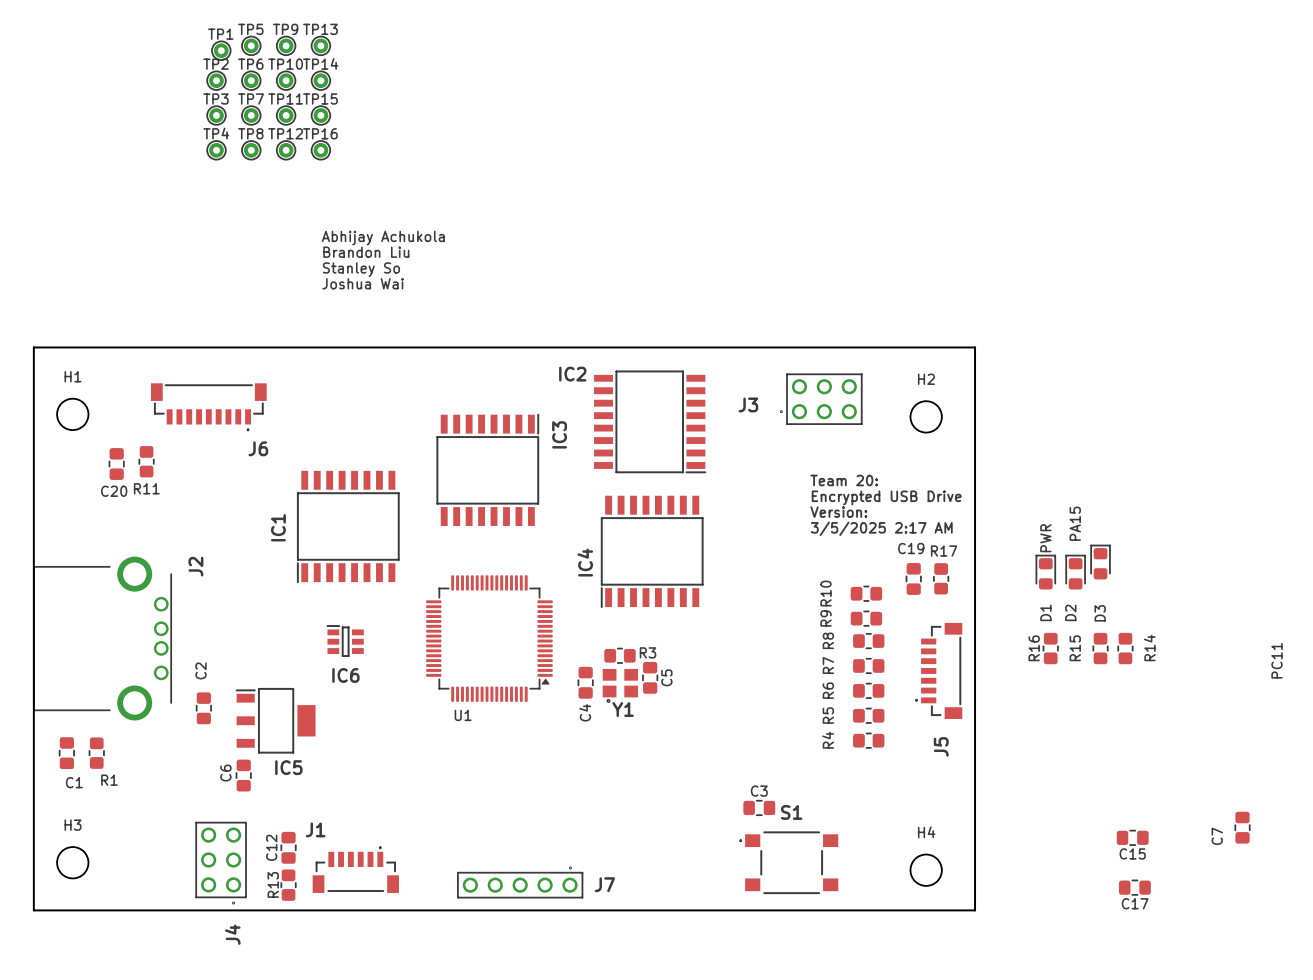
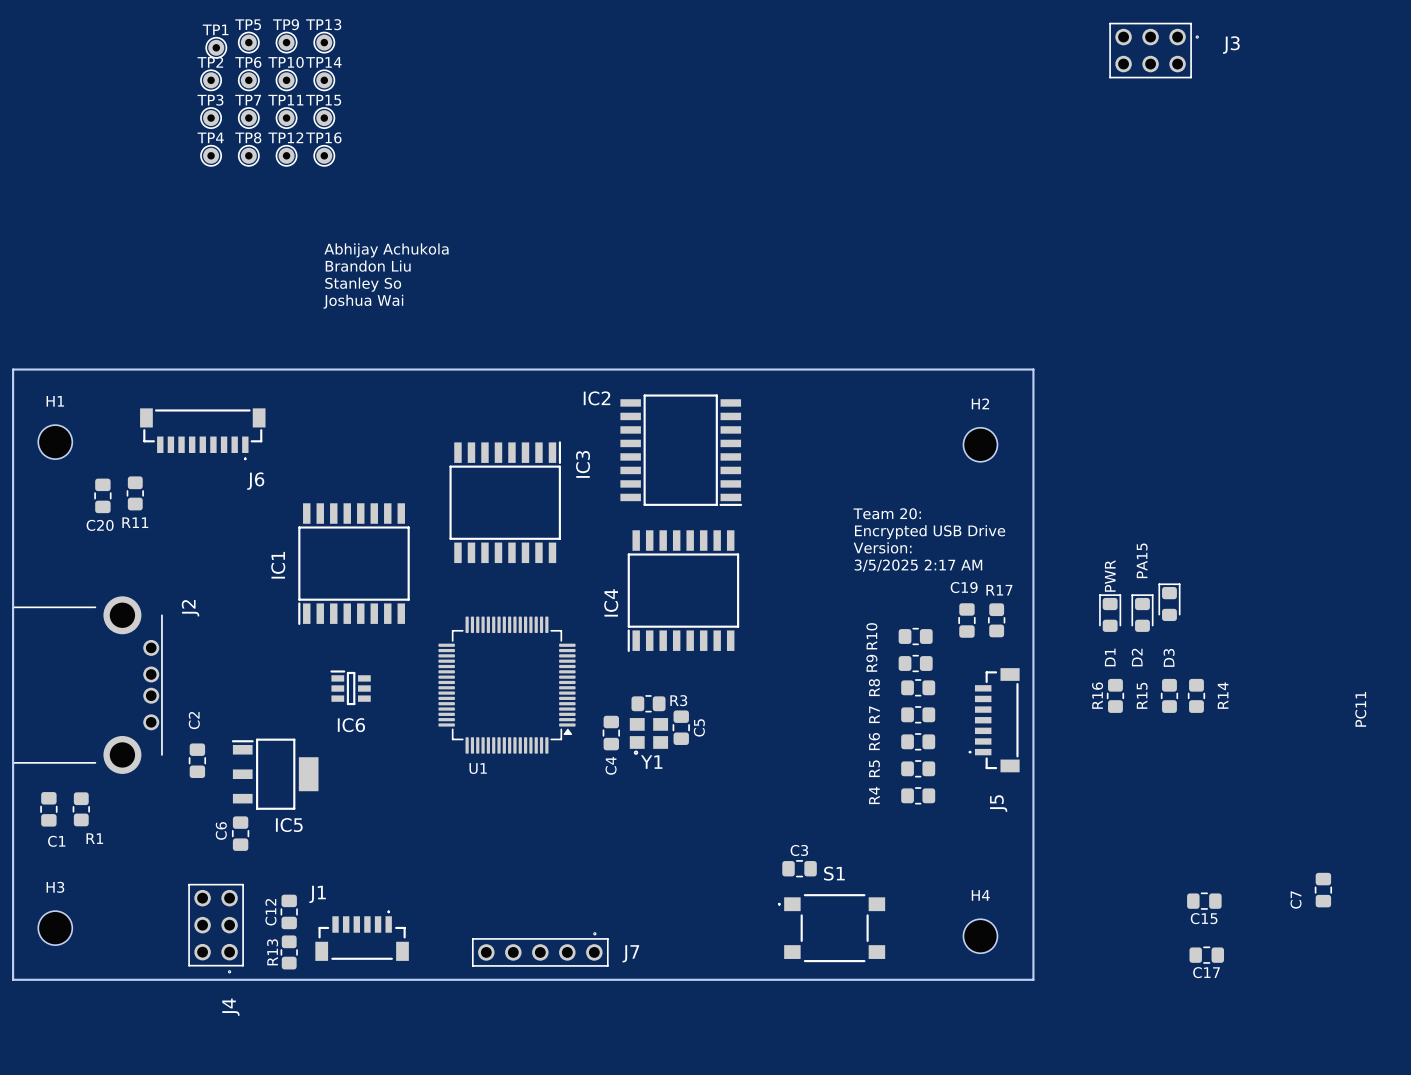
J3 rotation: 0° (821, 399) -> 180° (1154, 50)
J3 position: (821, 399) -> (1154, 50)

